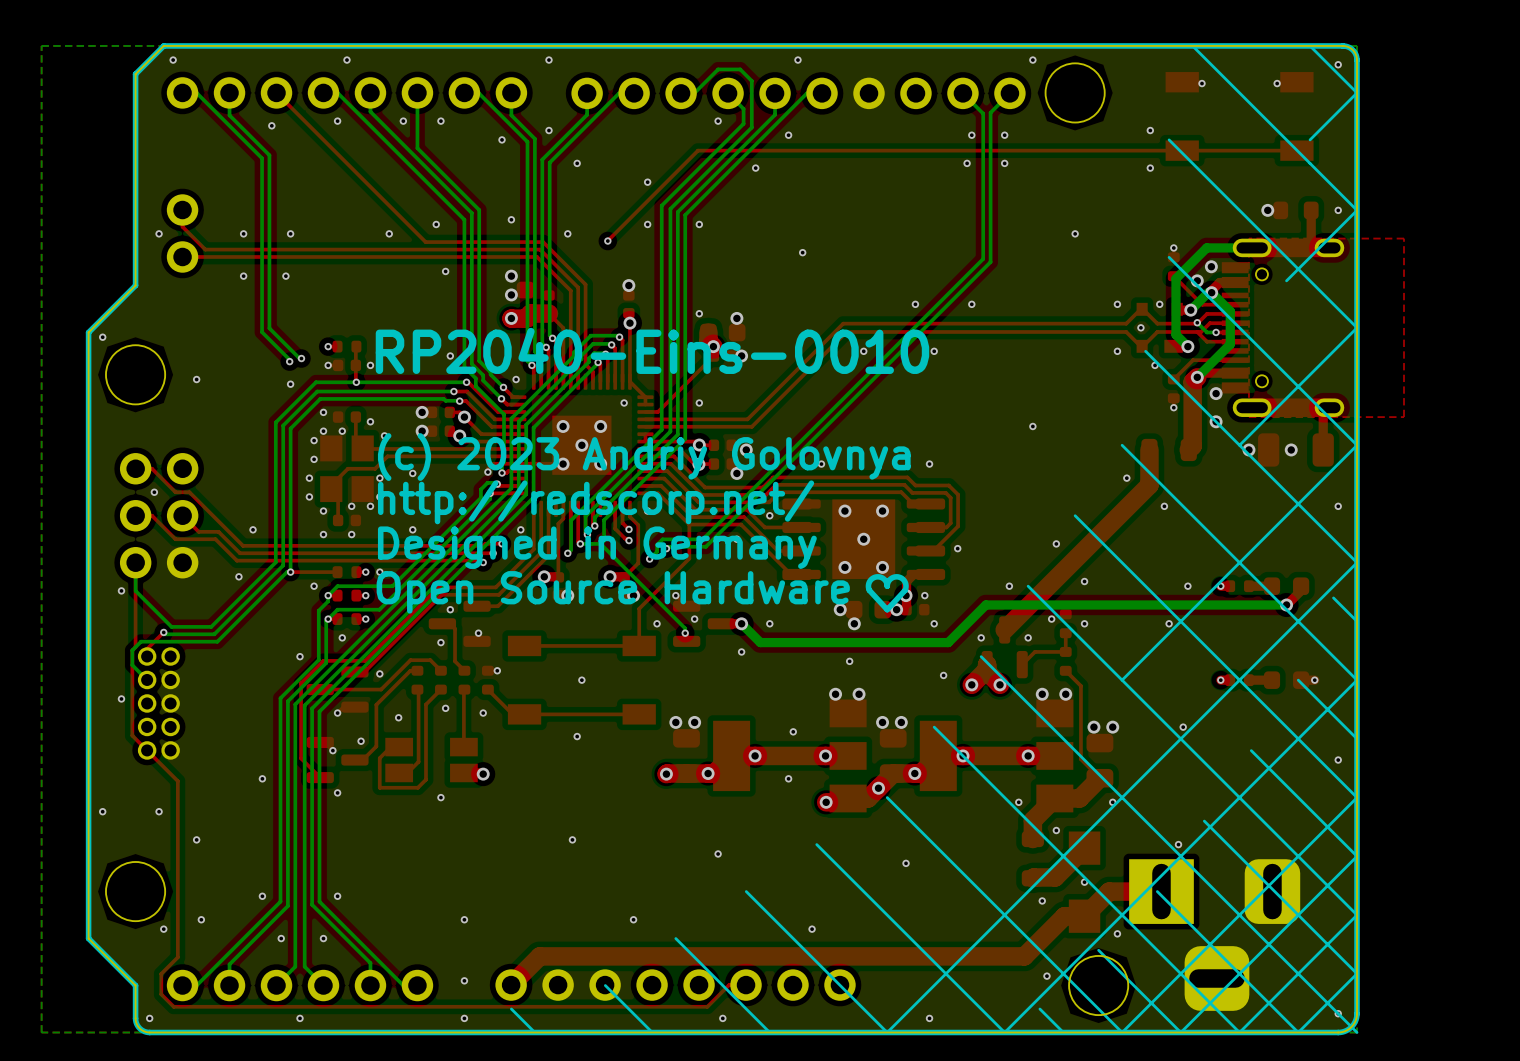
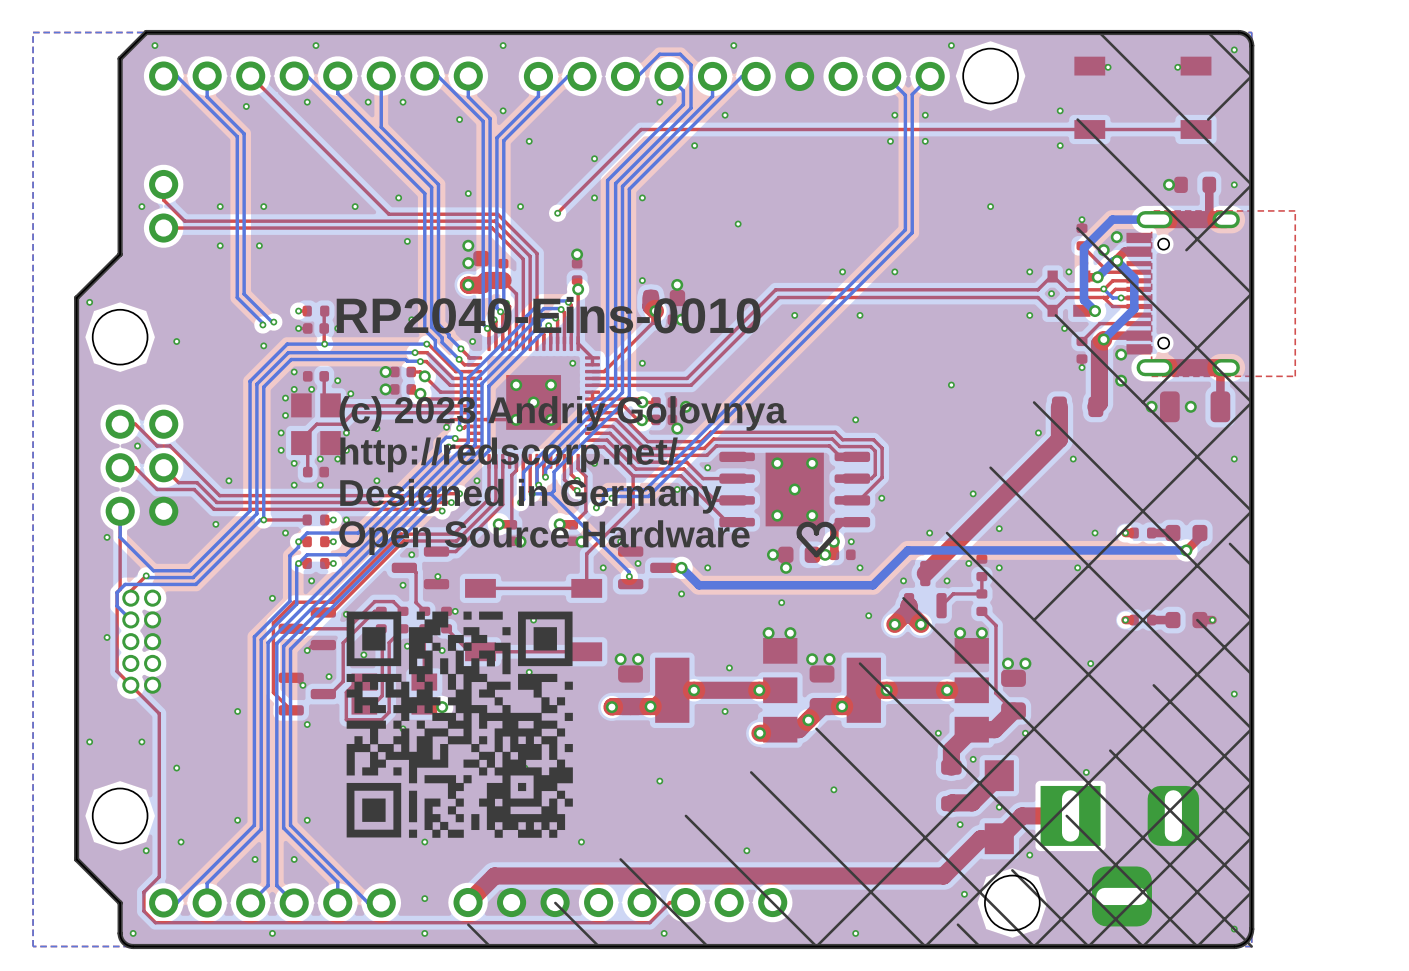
drawing: none -> [346, 611, 573, 838]

